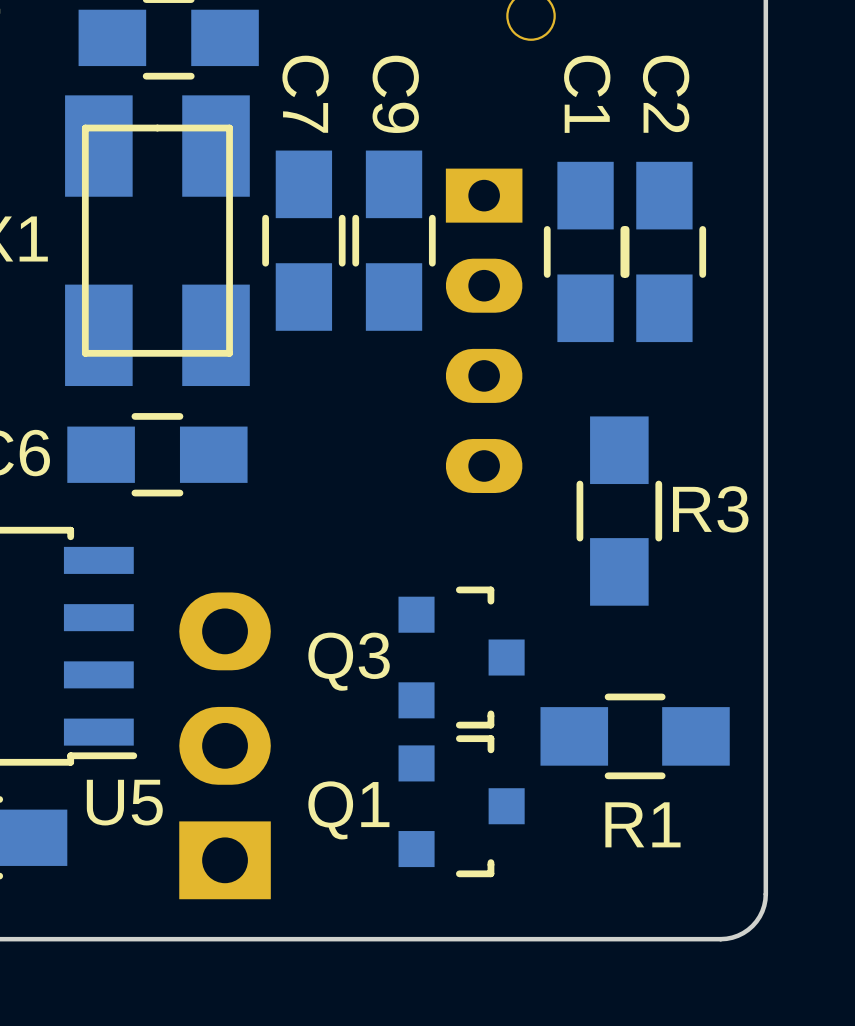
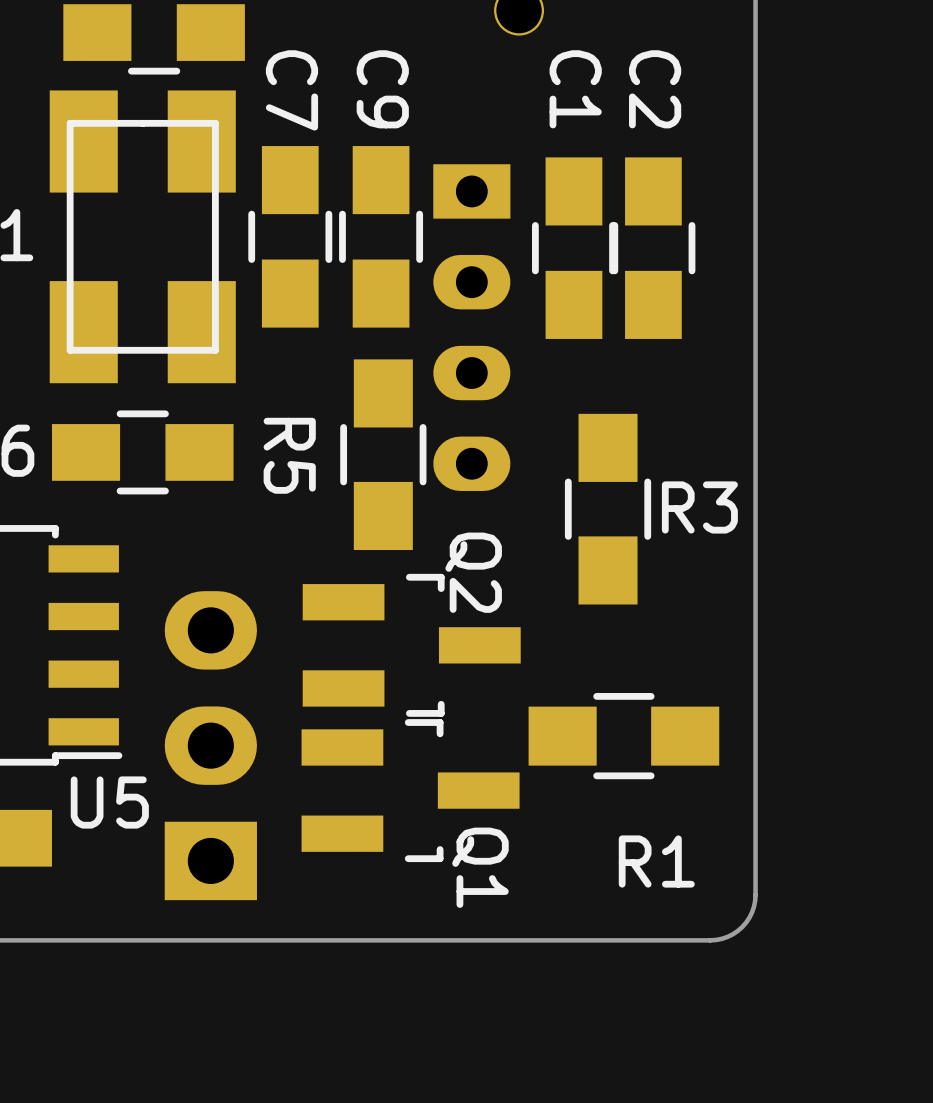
R5: none -> (383, 454)
Q2: none -> (411, 645)
Q3: (461, 657) -> none
Q1 footprint: [398, 735, 525, 878] -> [301, 719, 520, 863]
Q1 name position: Q1 (348, 810) -> Q1 (480, 867)
R1 name position: R1 (642, 824) -> R1 (656, 861)

